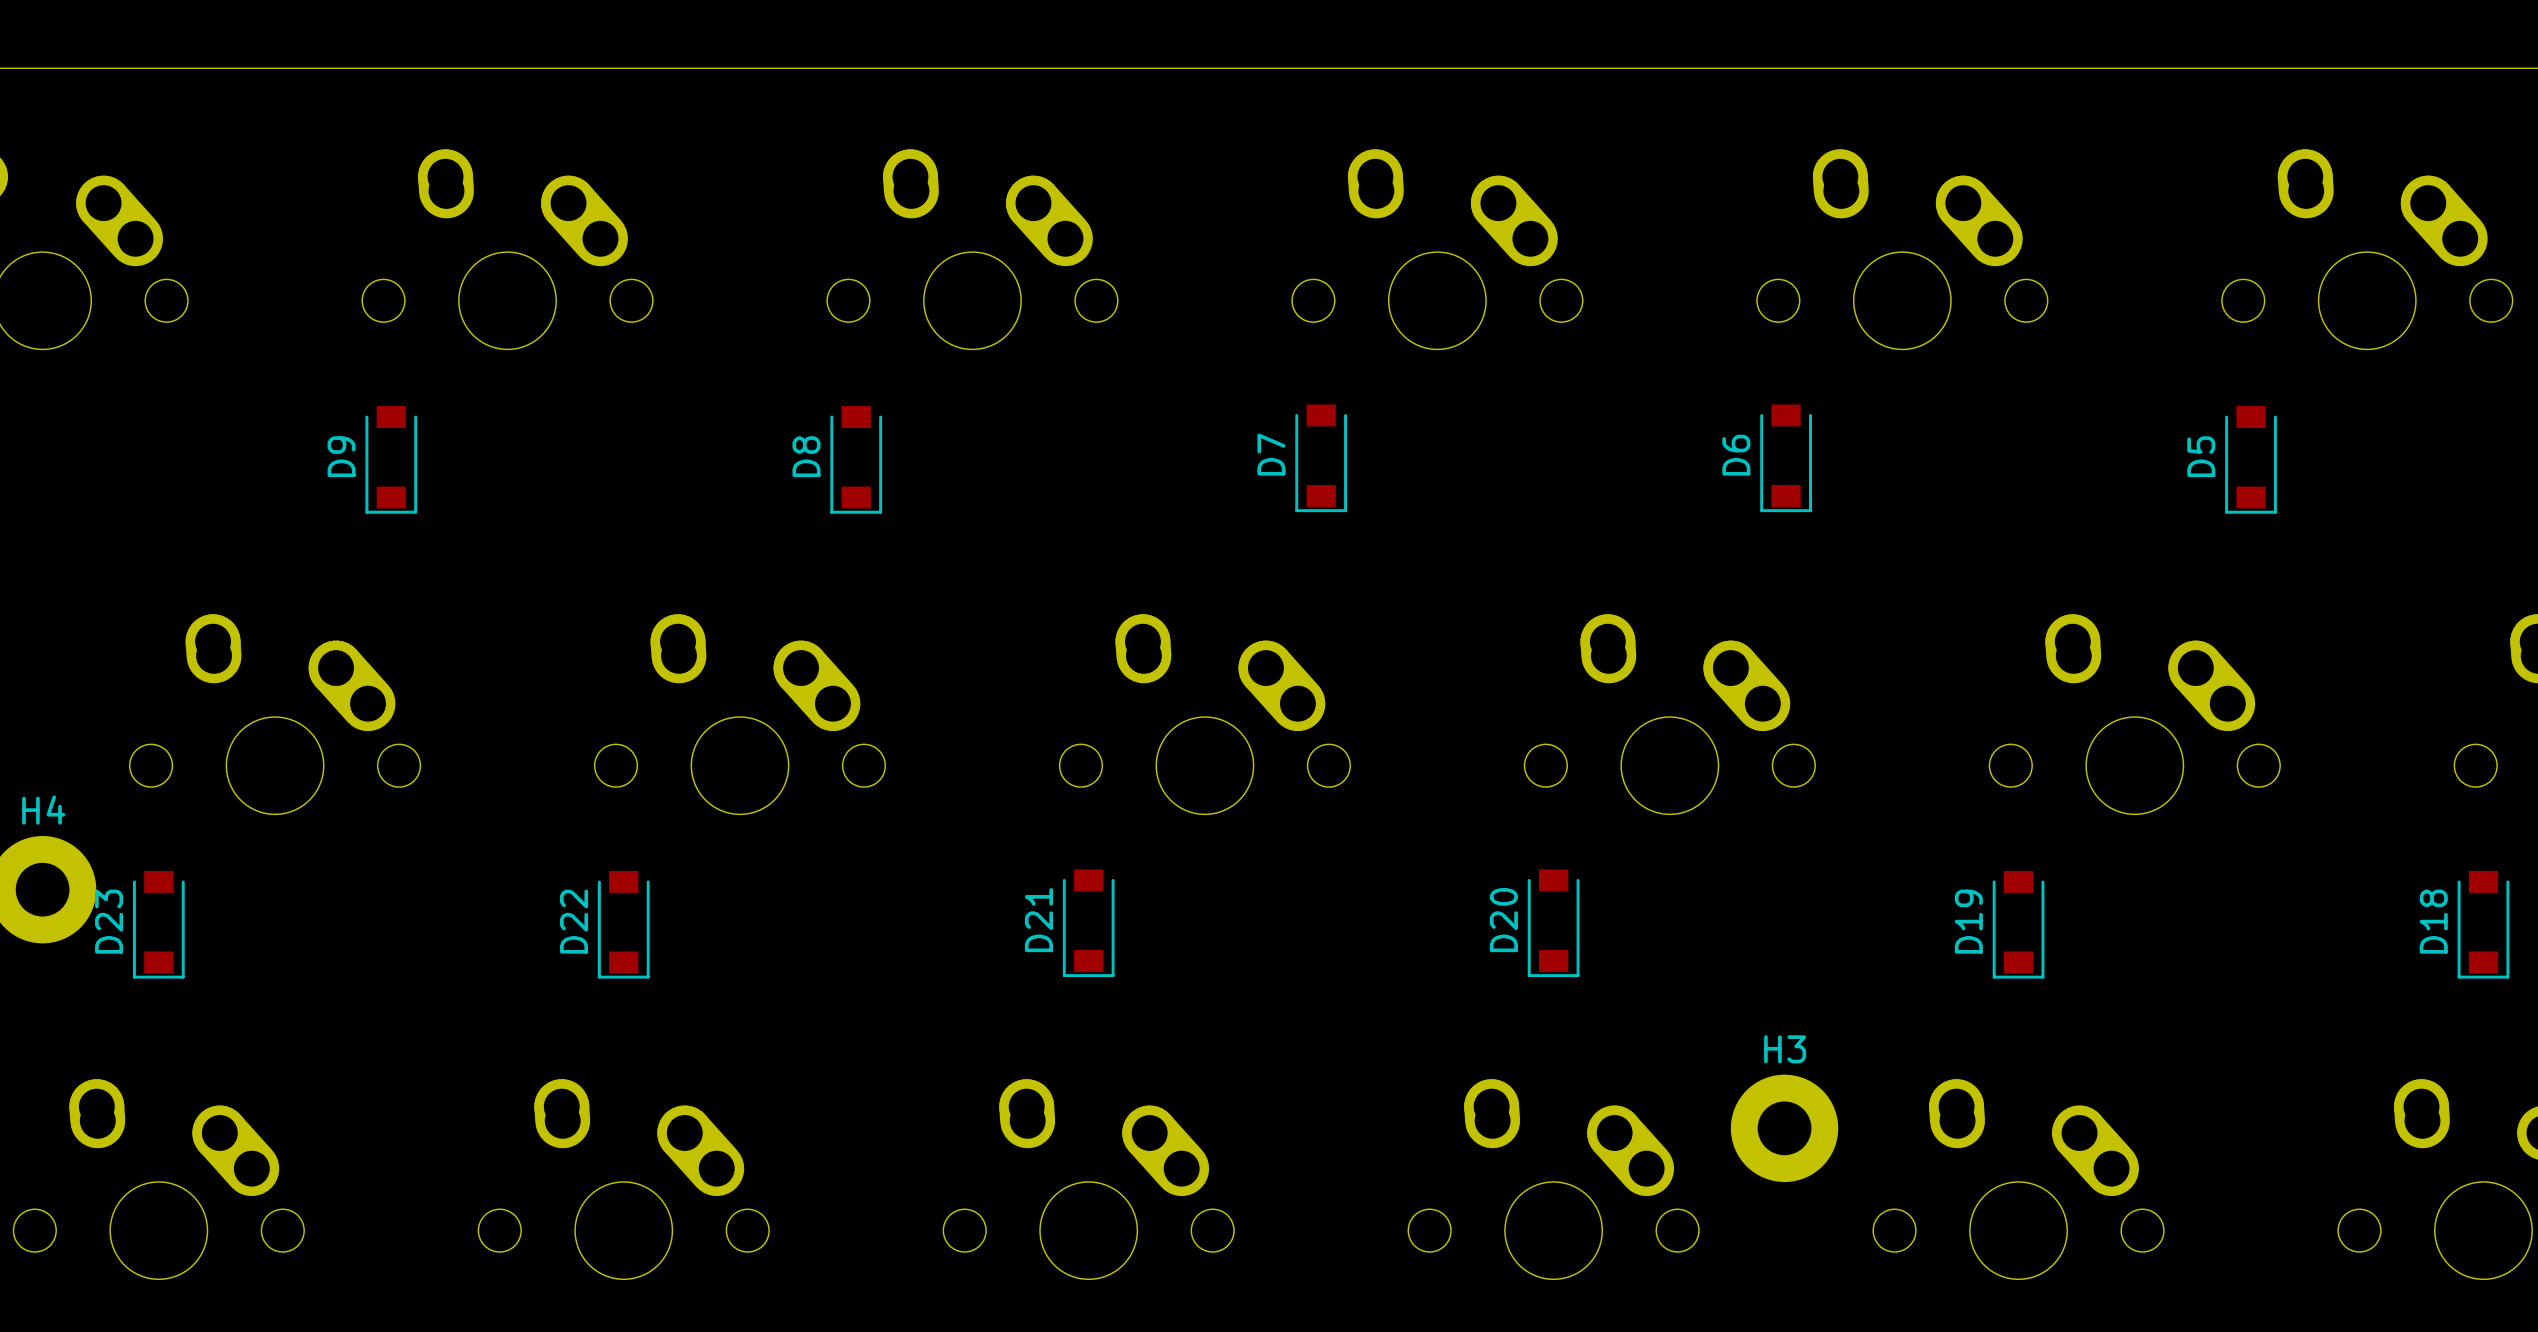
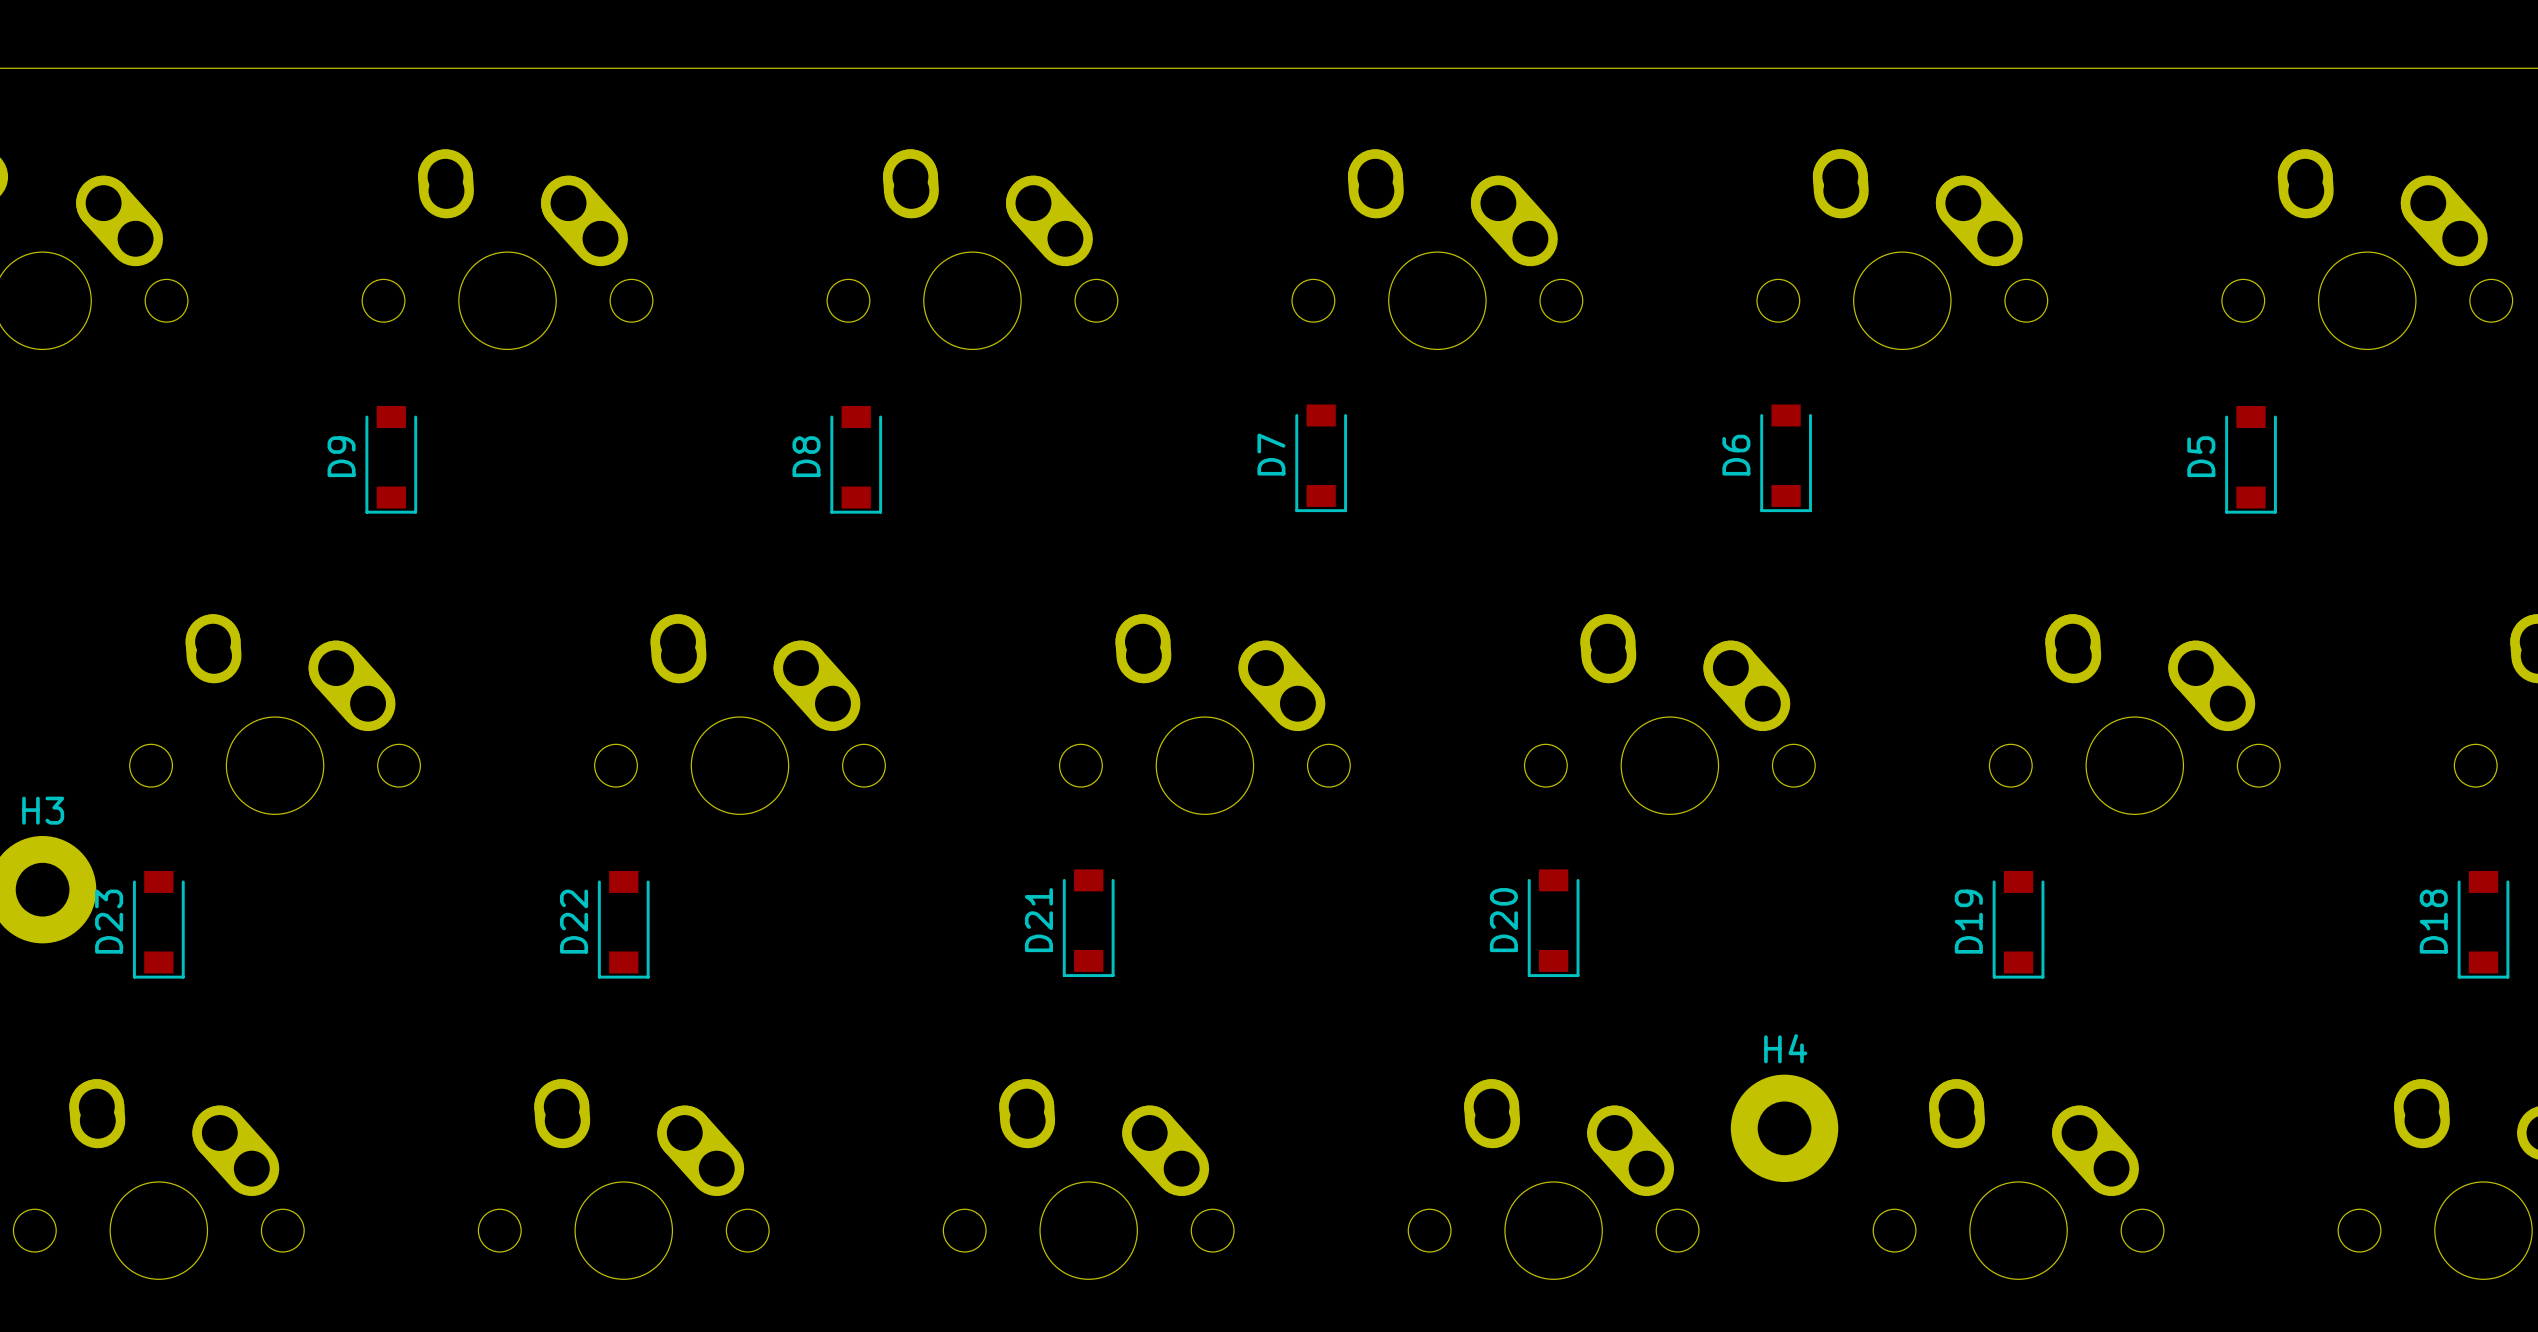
H4 name: H4 (43, 810) -> H3 (43, 810)
H3 name: H3 (1785, 1049) -> H4 (1785, 1048)

